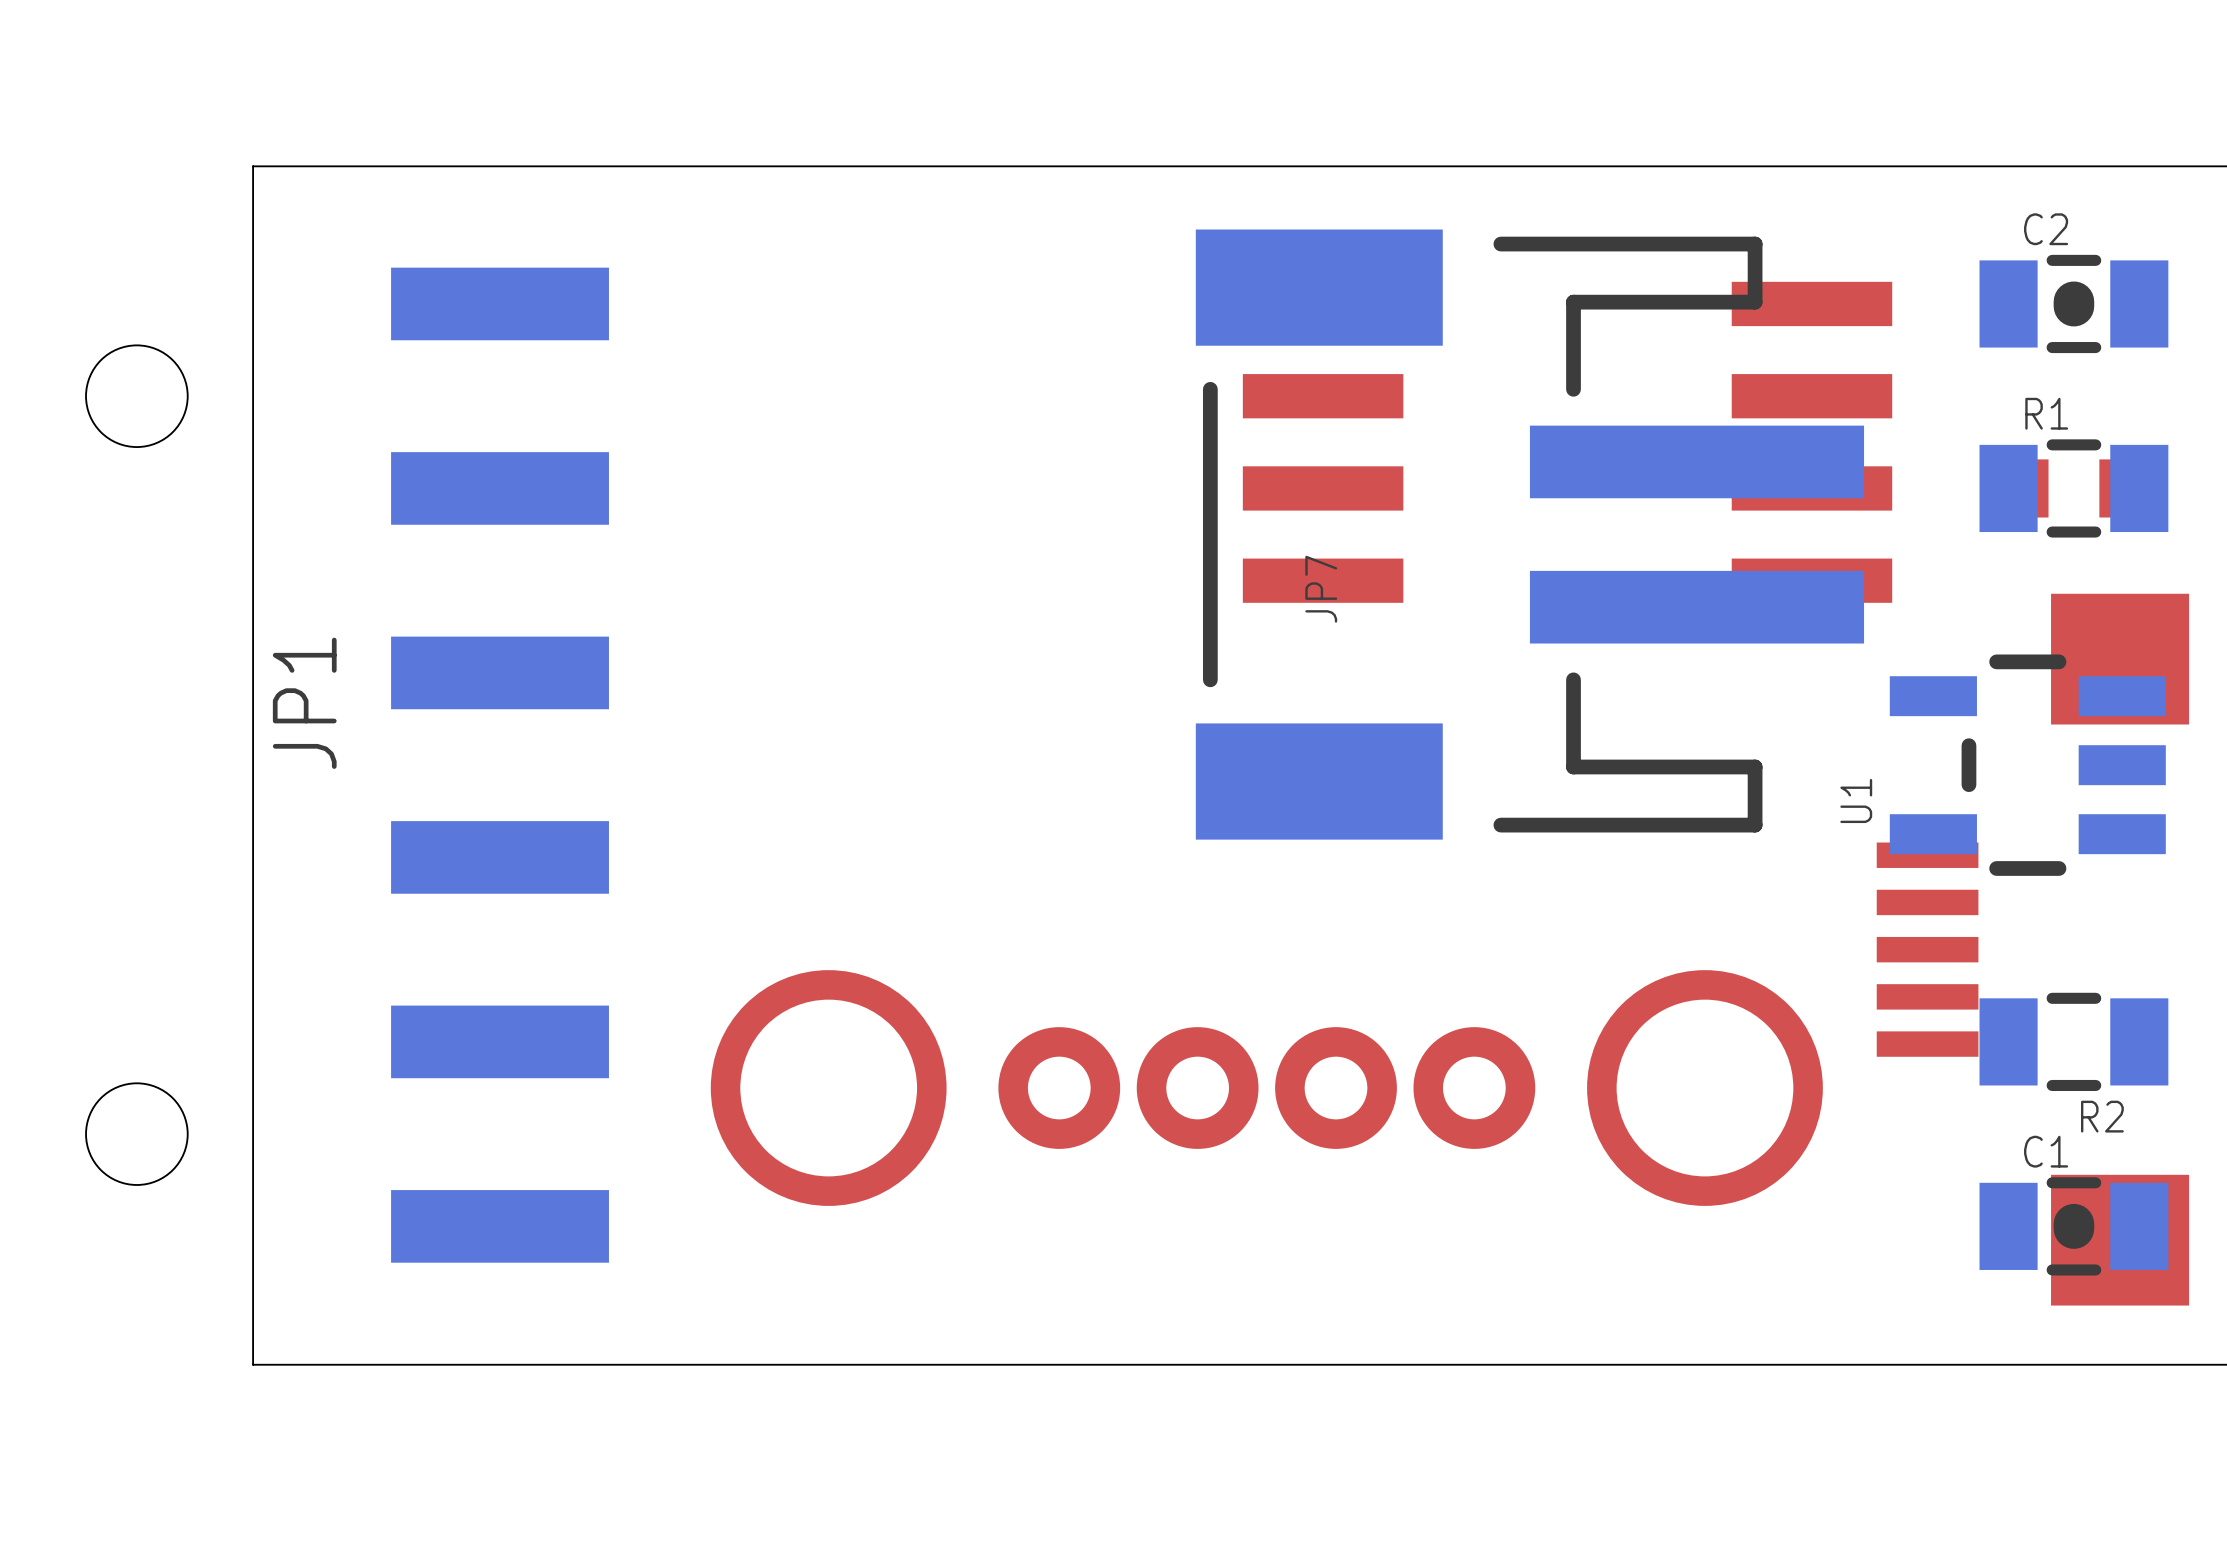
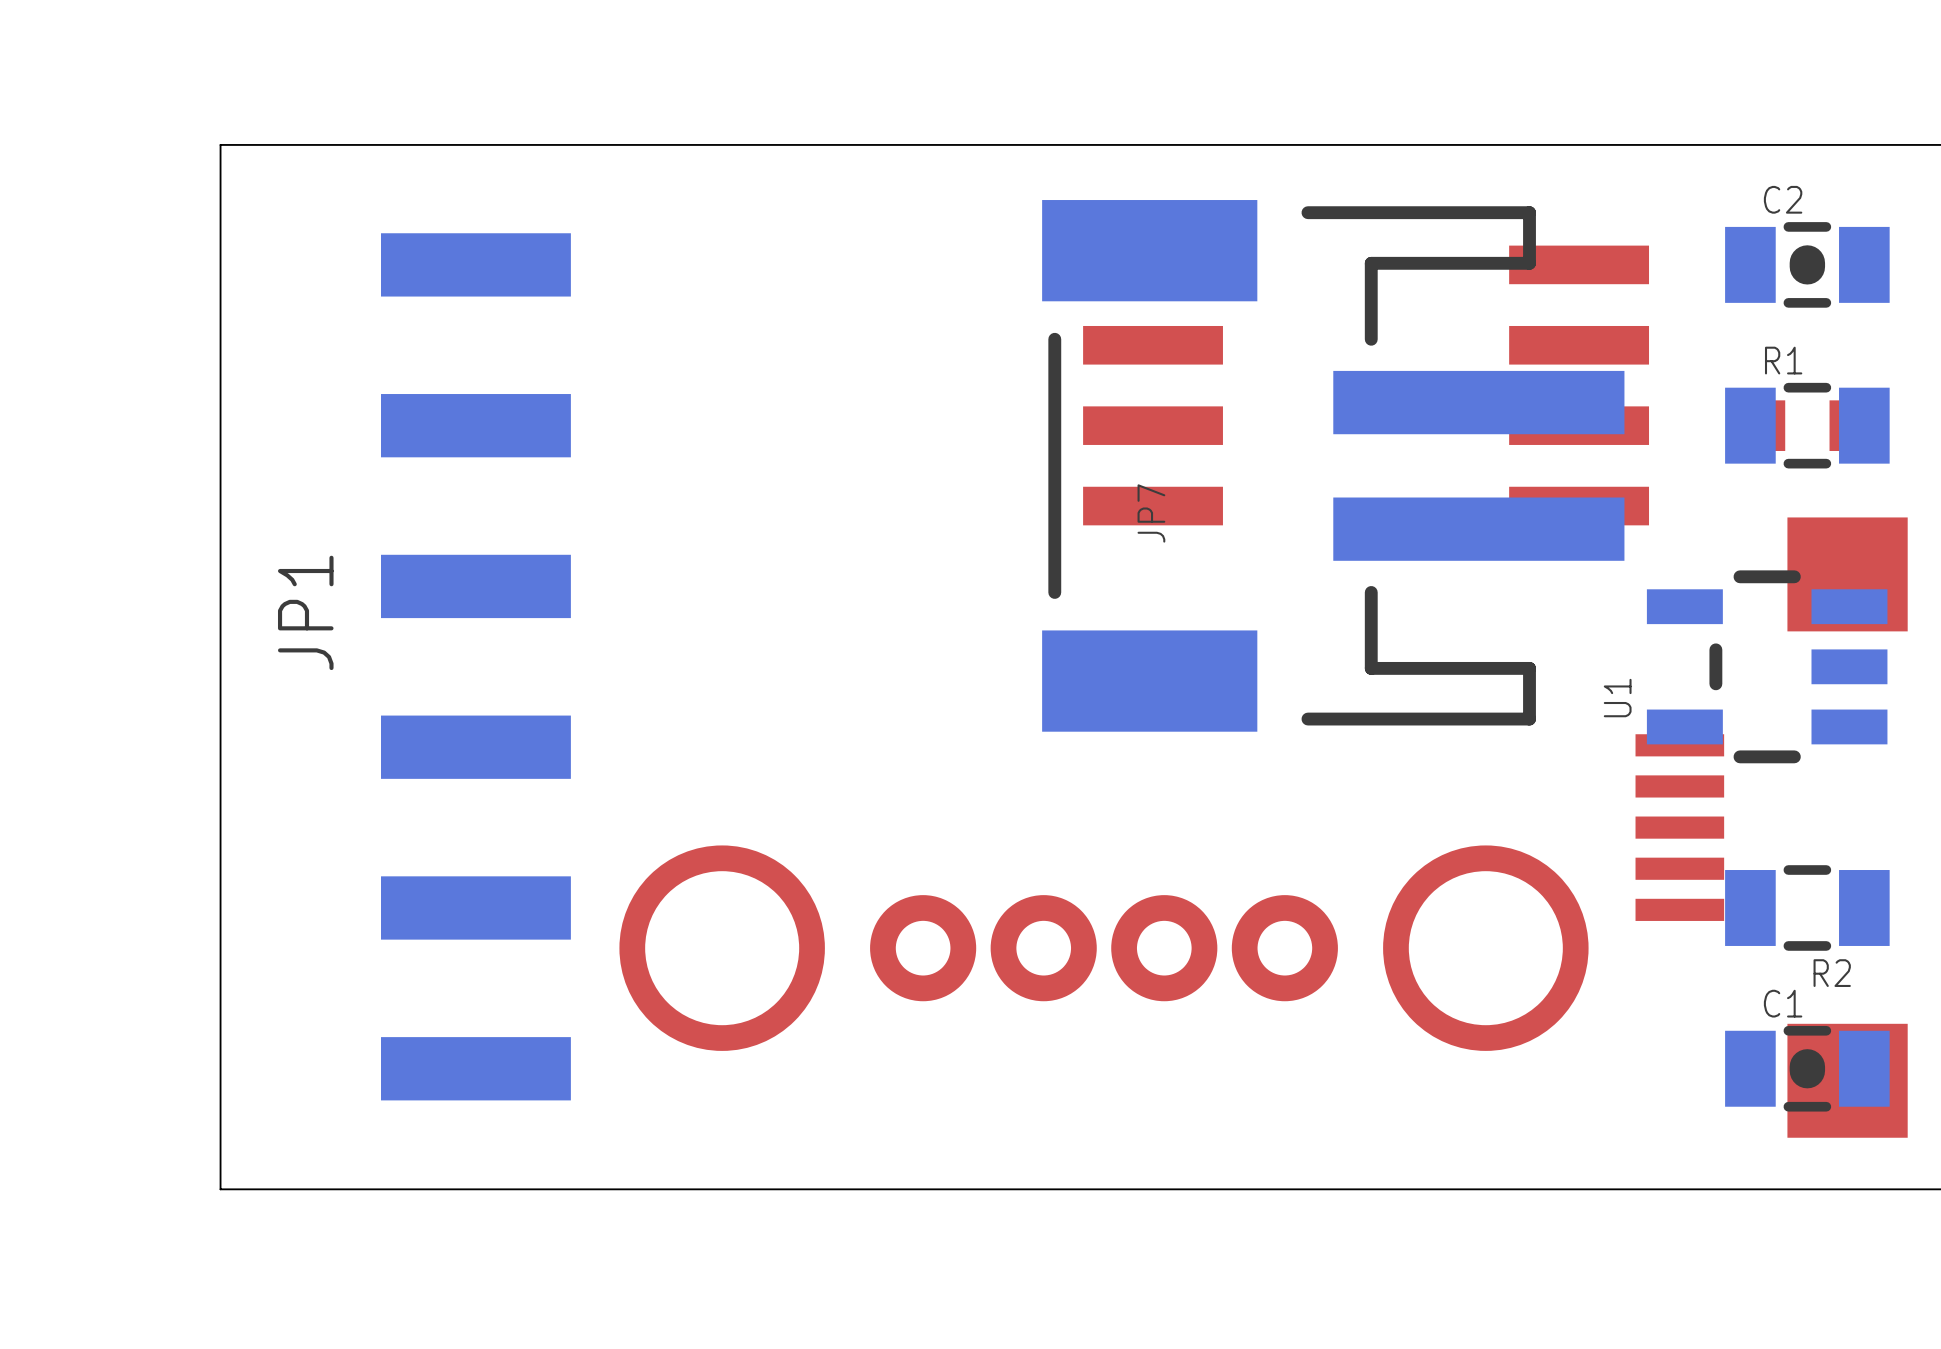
JP1 footprint: [86, 267, 609, 1263] -> [381, 233, 571, 1101]
JP1 name position: JP1 (304, 703) -> JP1 (305, 612)

